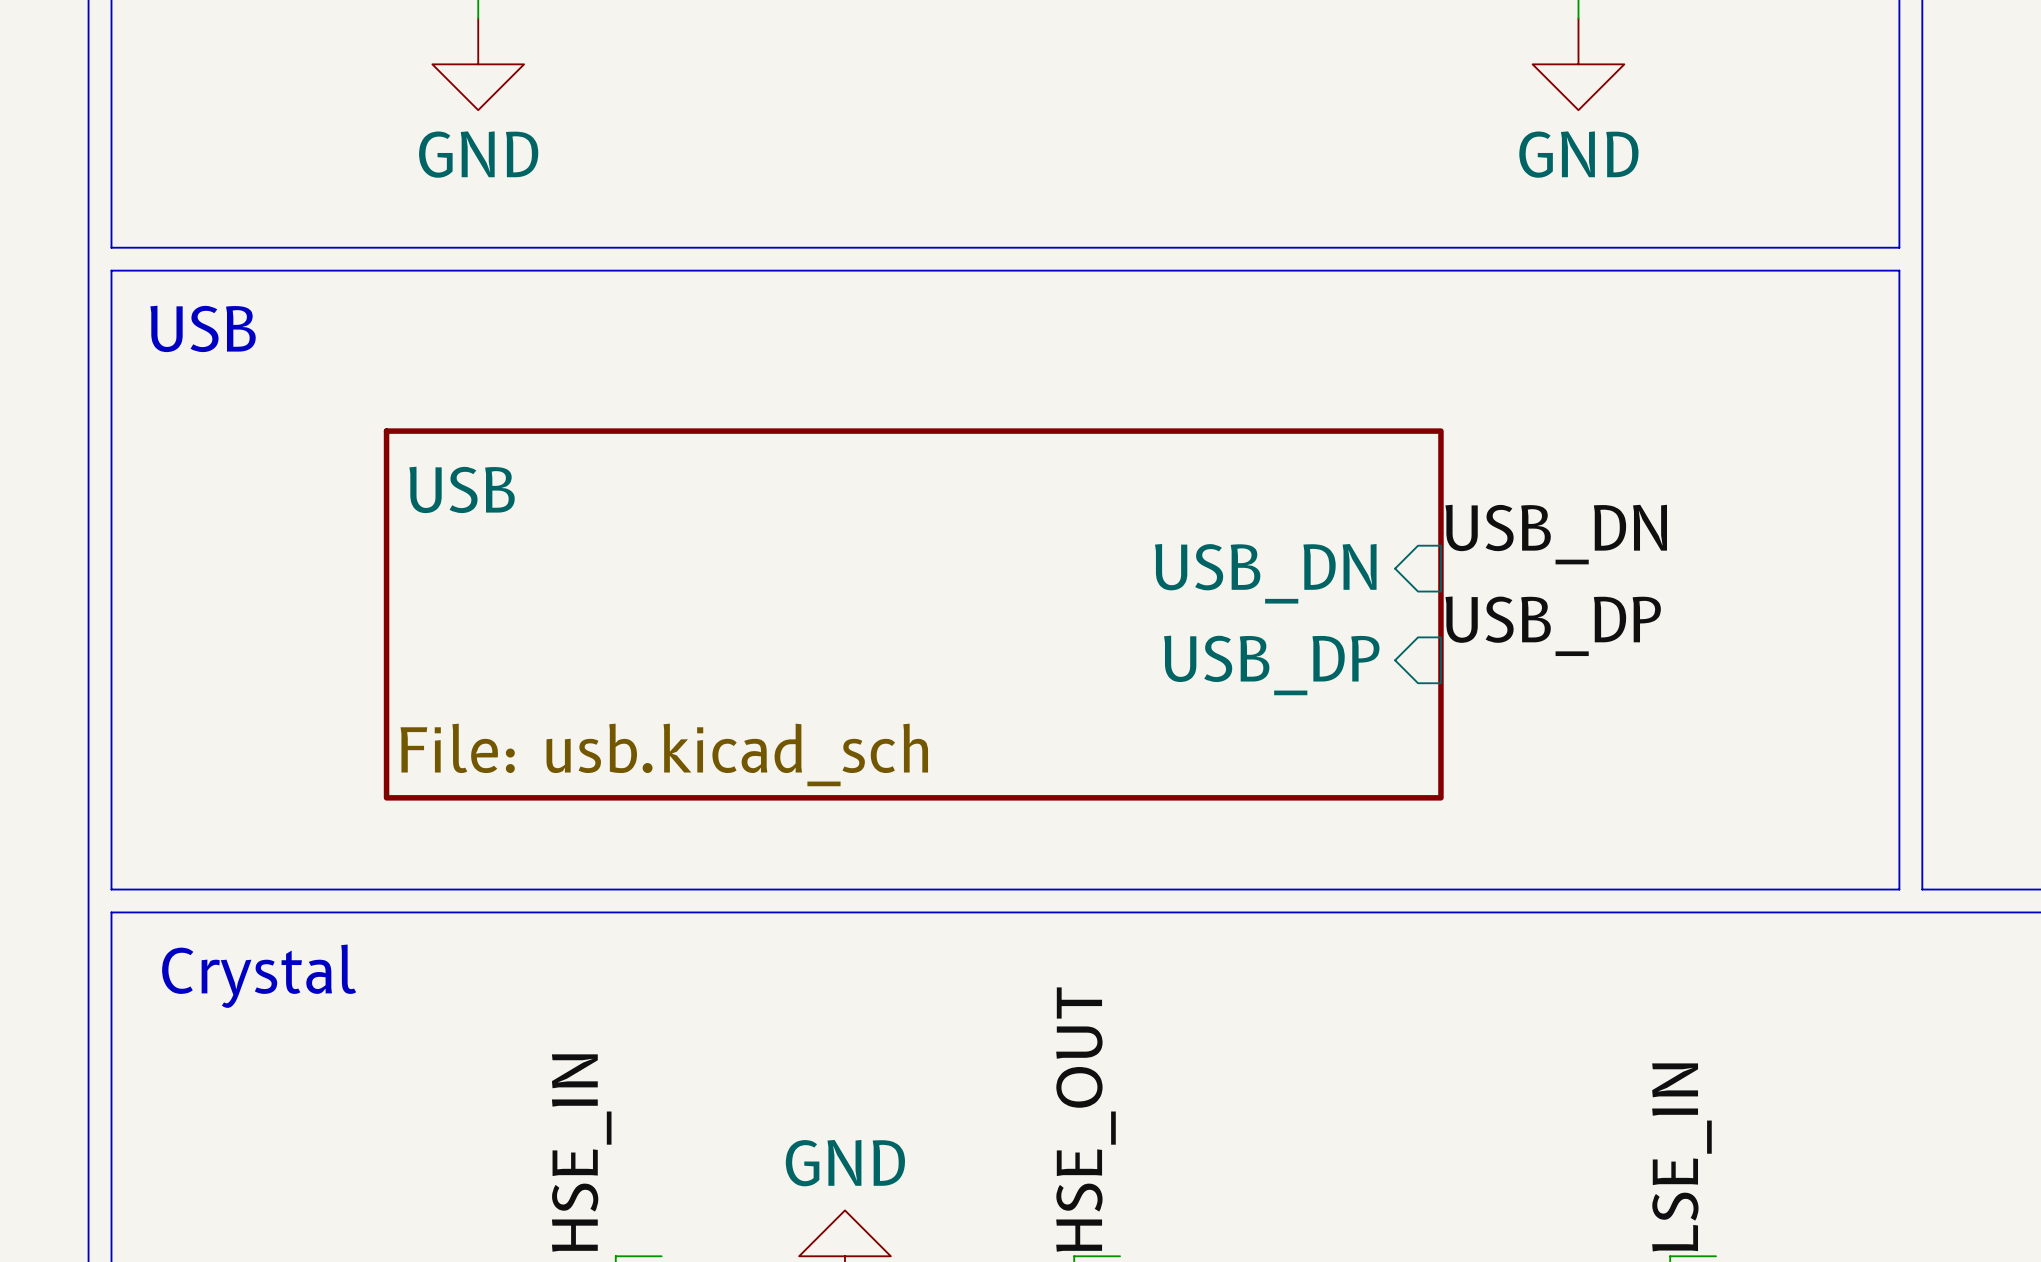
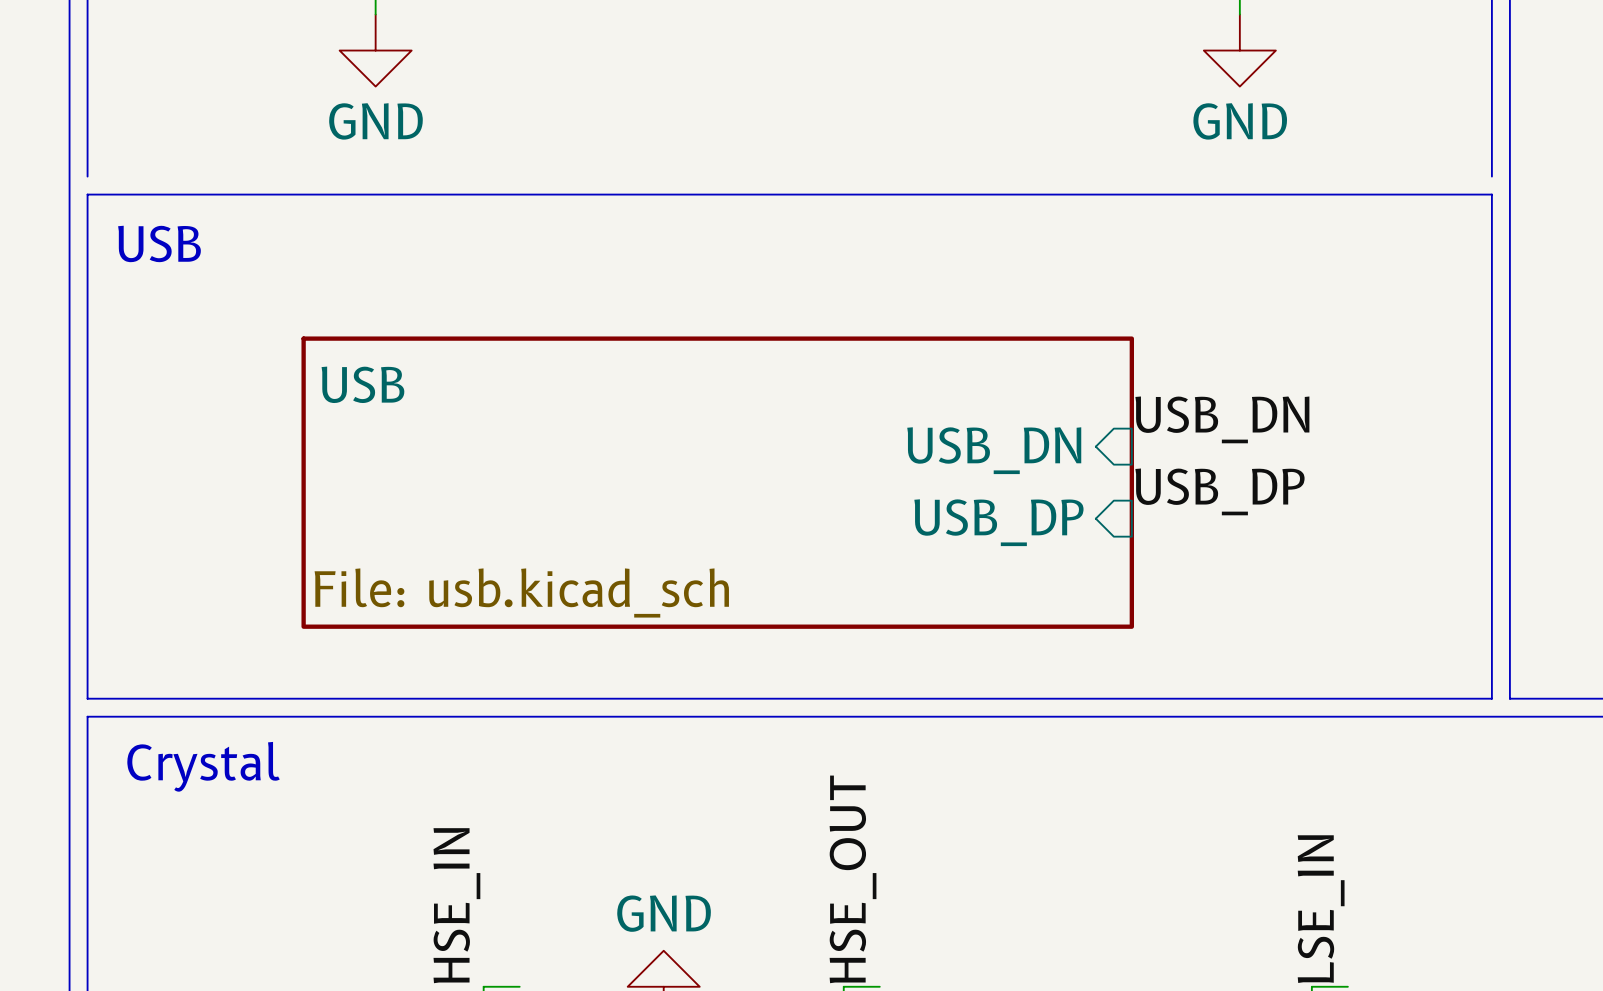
line: (111, 224) (111, 247) -> (87, 212) (87, 194)
line: (1899, 224) (1899, 247) -> (1491, 212) (1491, 194)
line: (111, 270) (1899, 270) -> none
text position: USB (203, 328) -> USB (159, 243)

